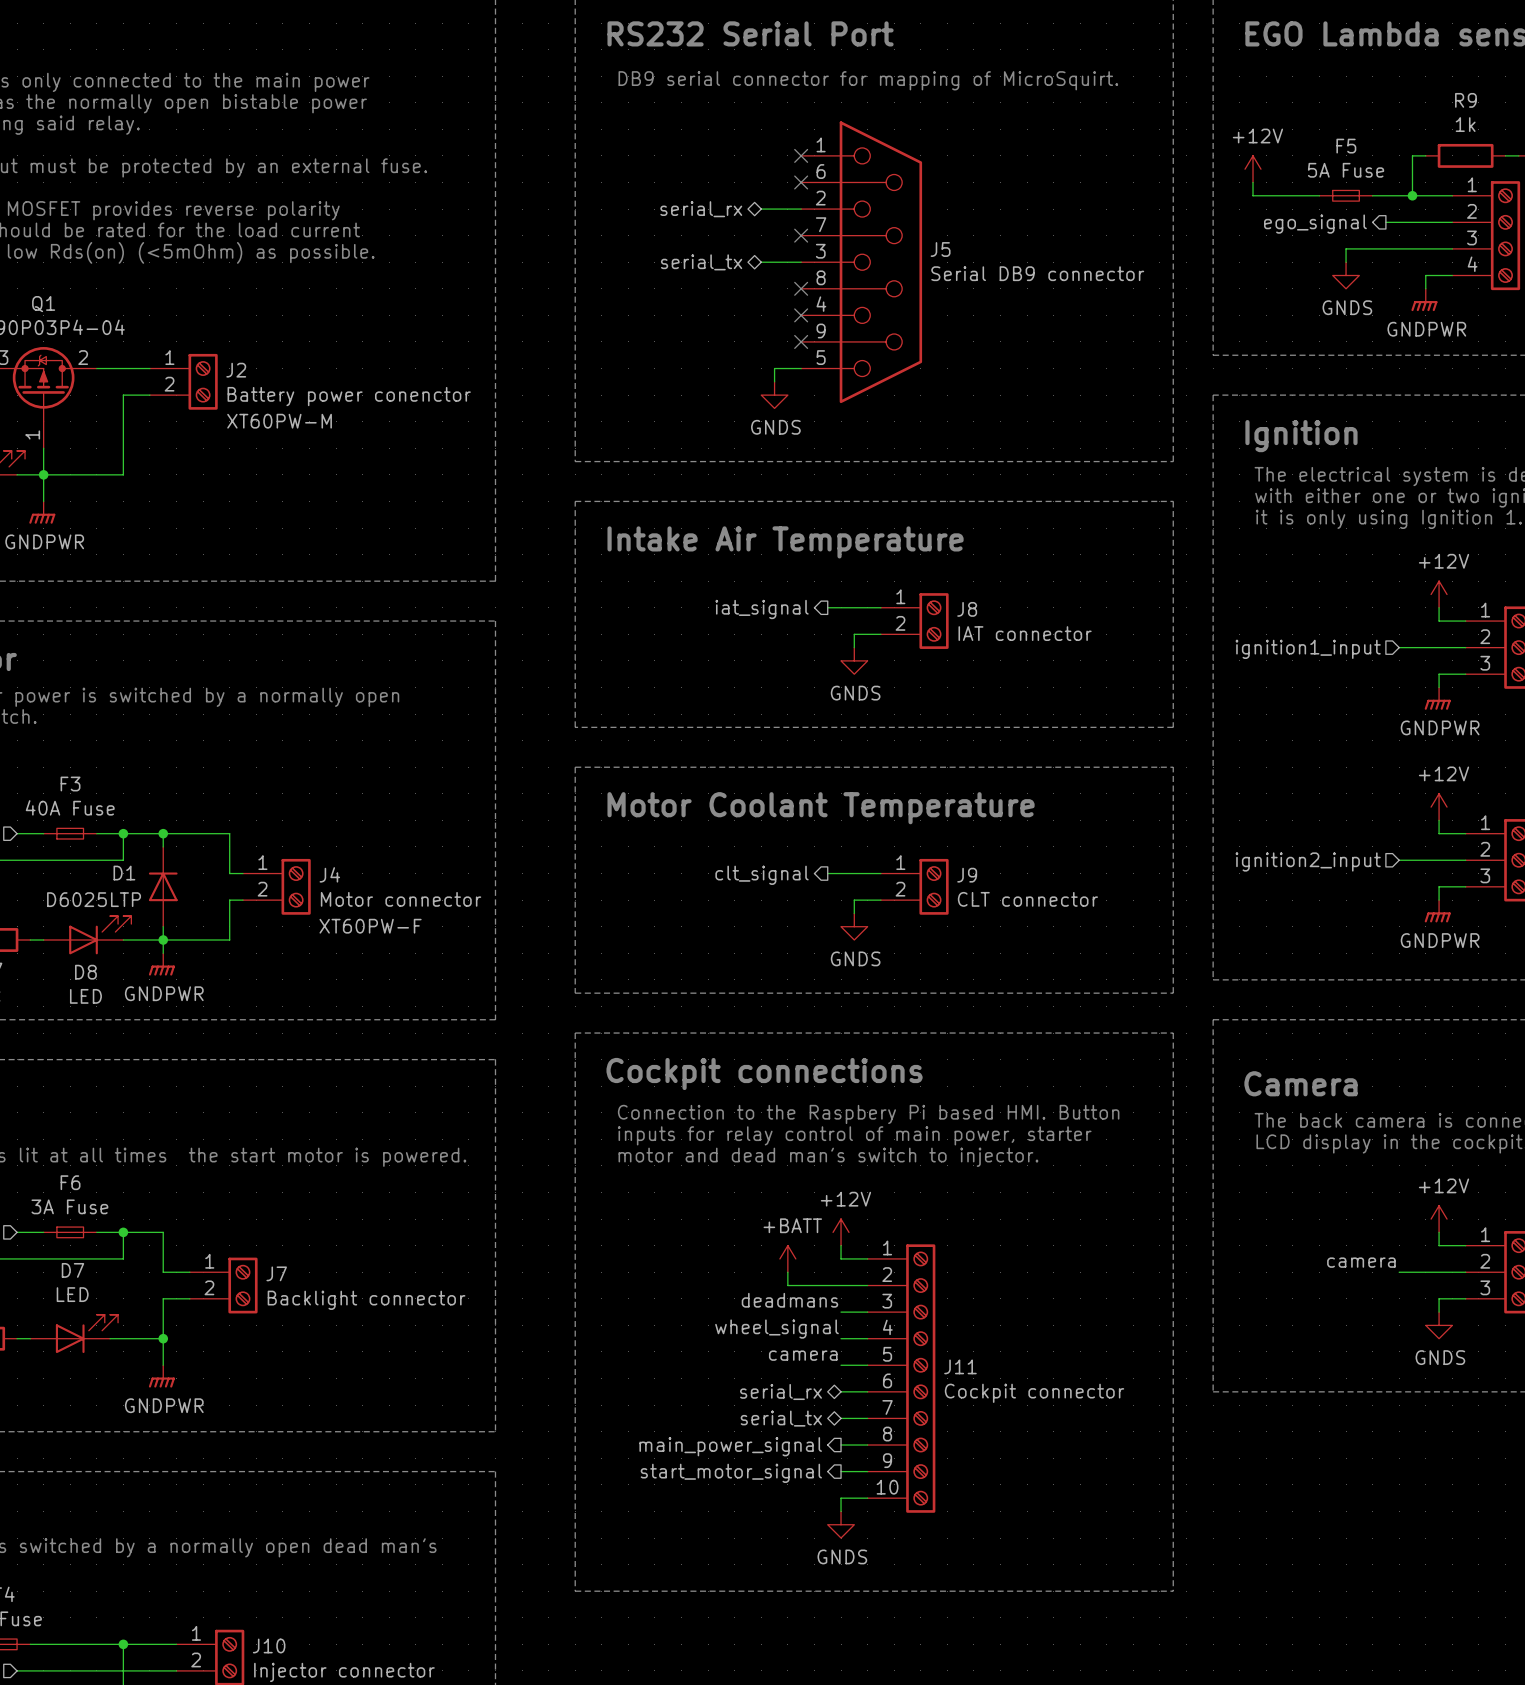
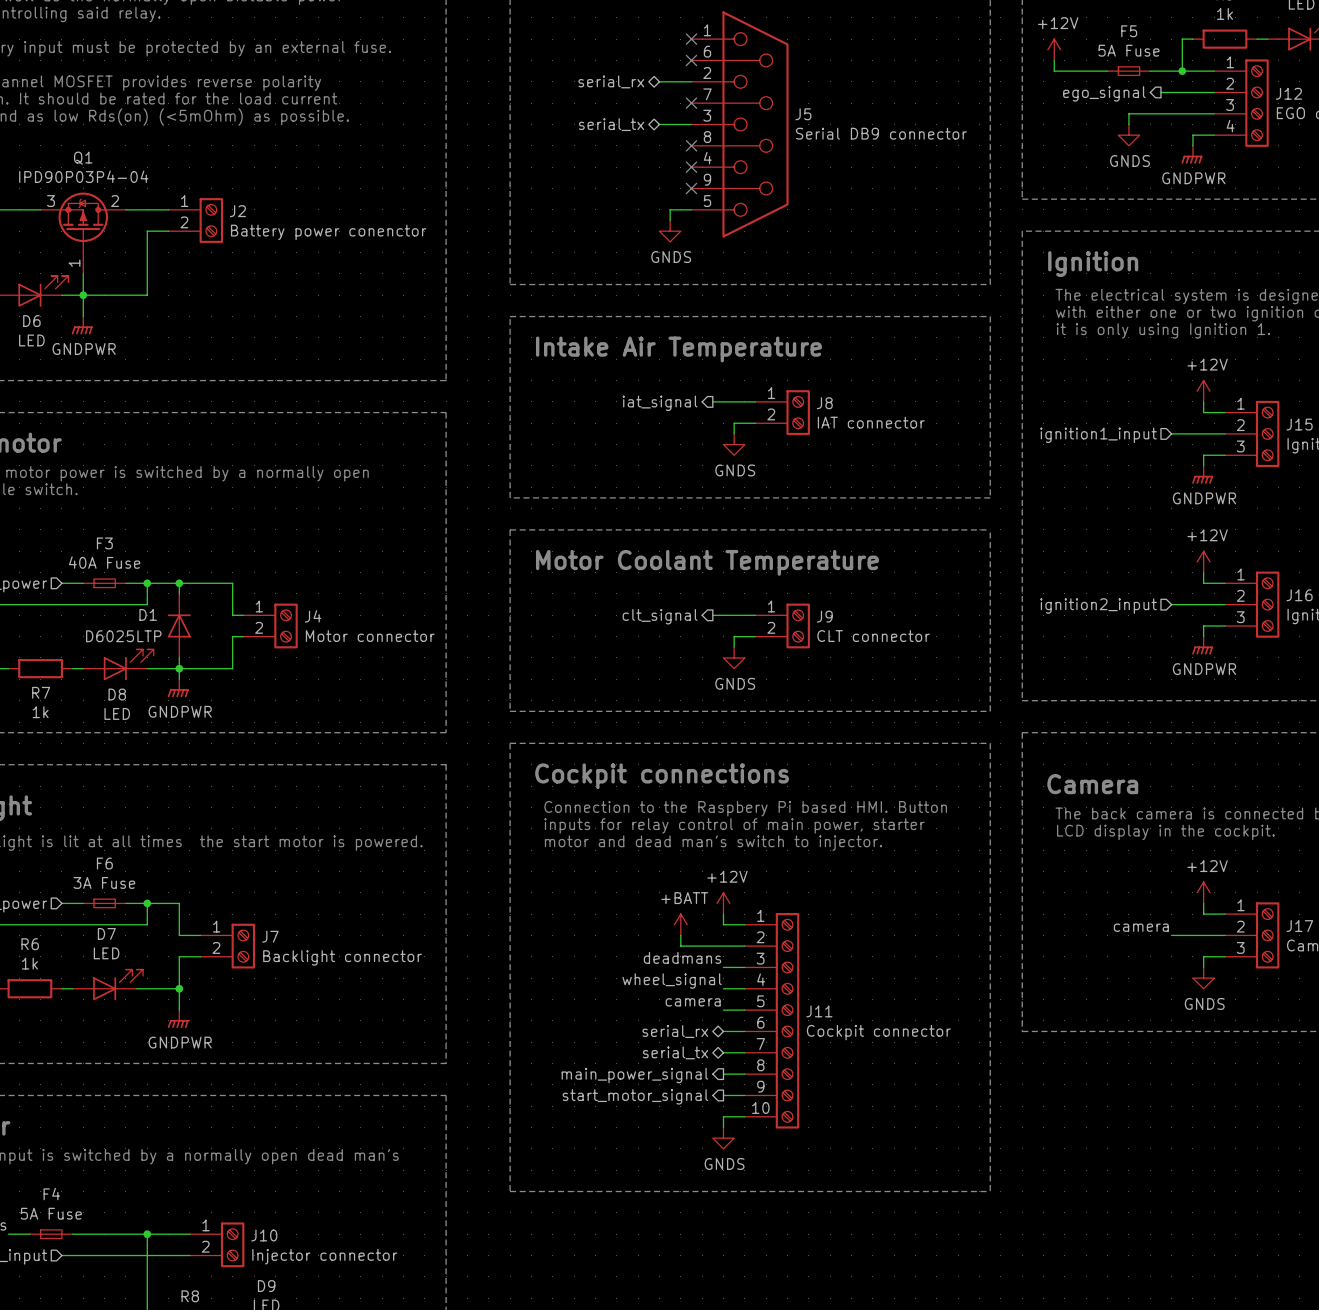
J2 text: XT60PW-M (279, 421) -> none
J4 text: XT60PW-F (370, 926) -> none

